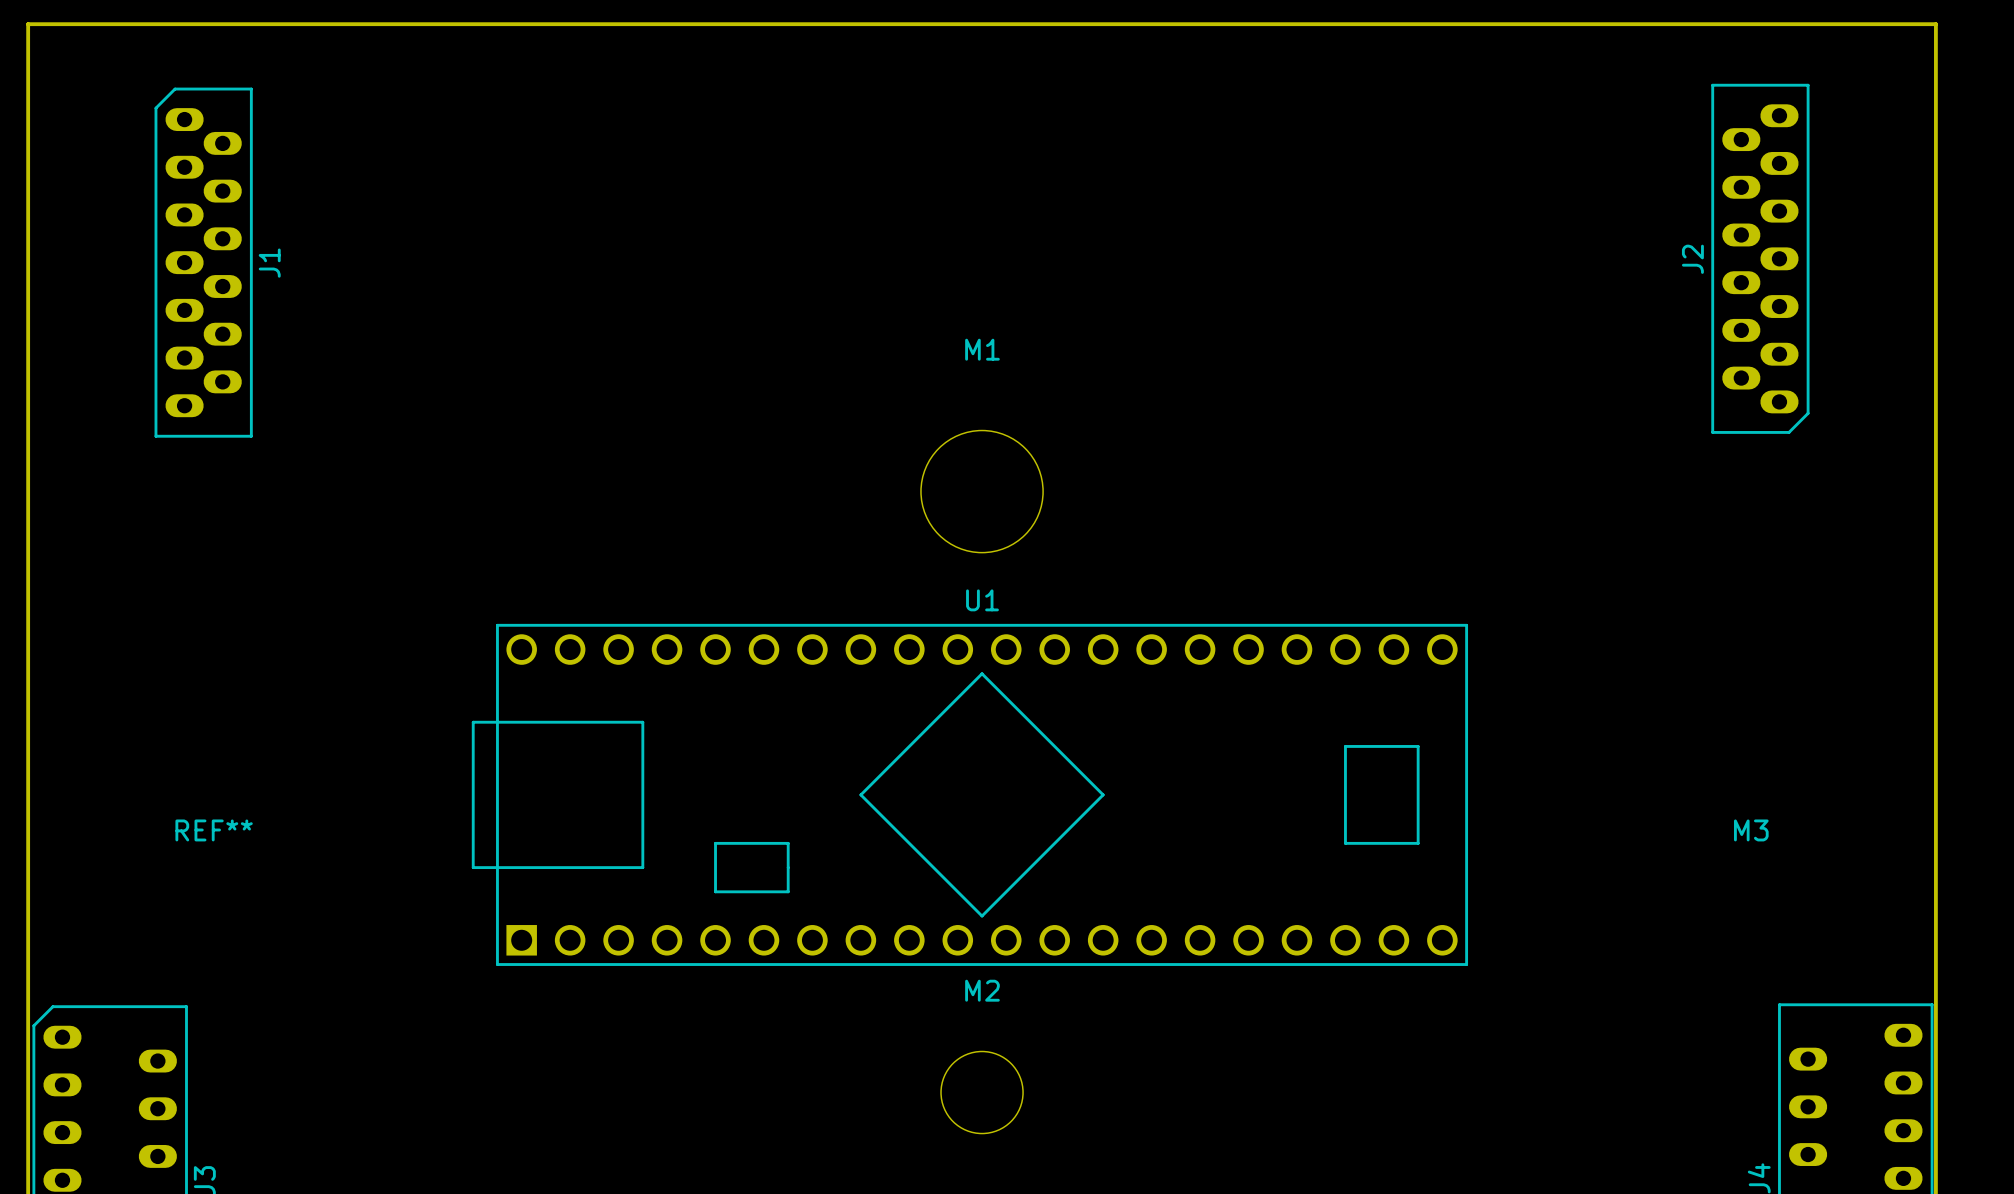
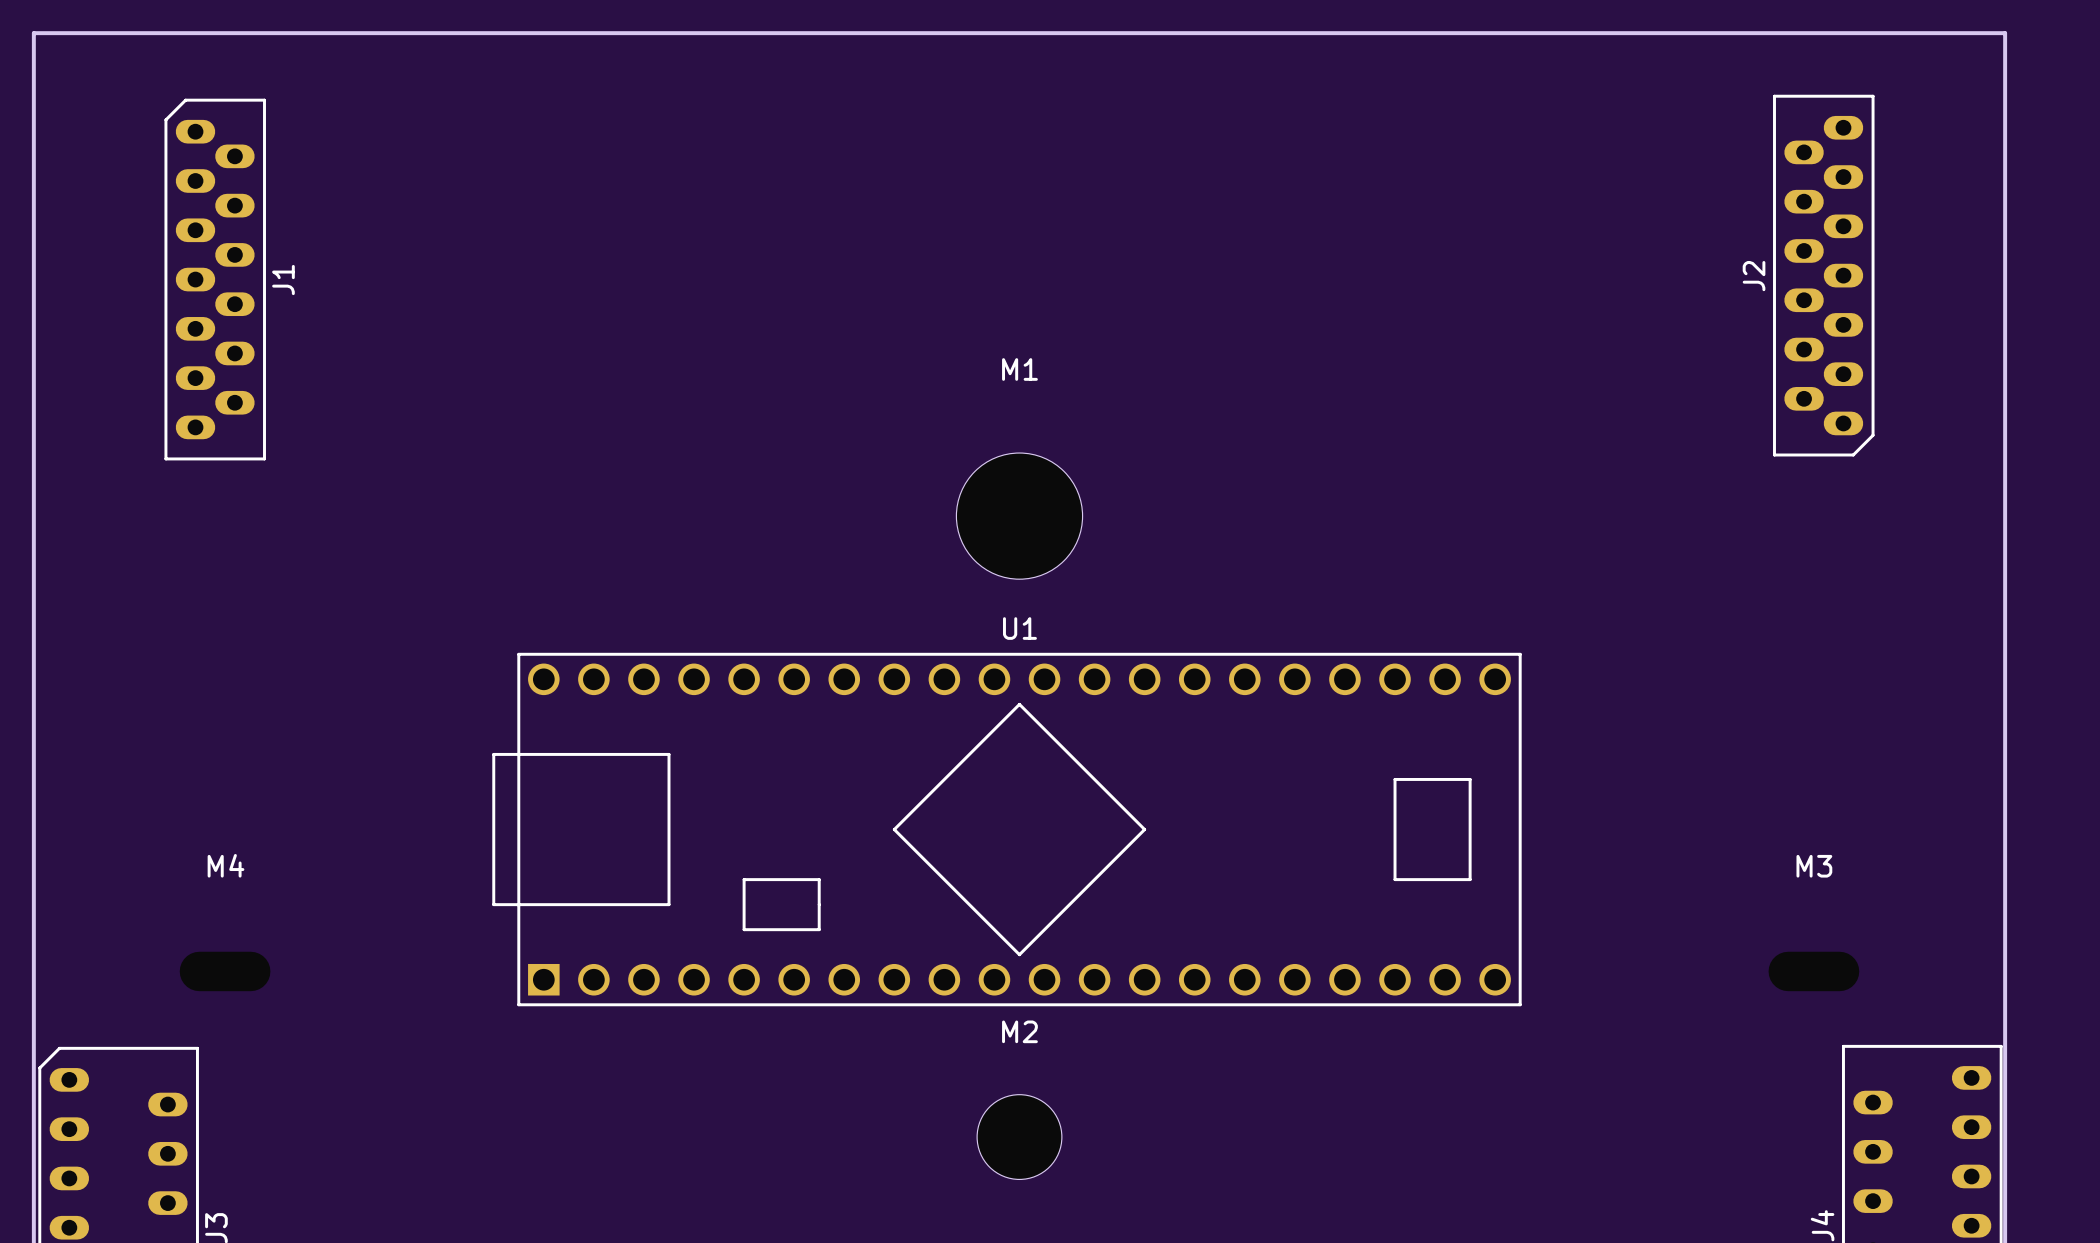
REF** name: REF** (214, 830) -> M4 (226, 865)

